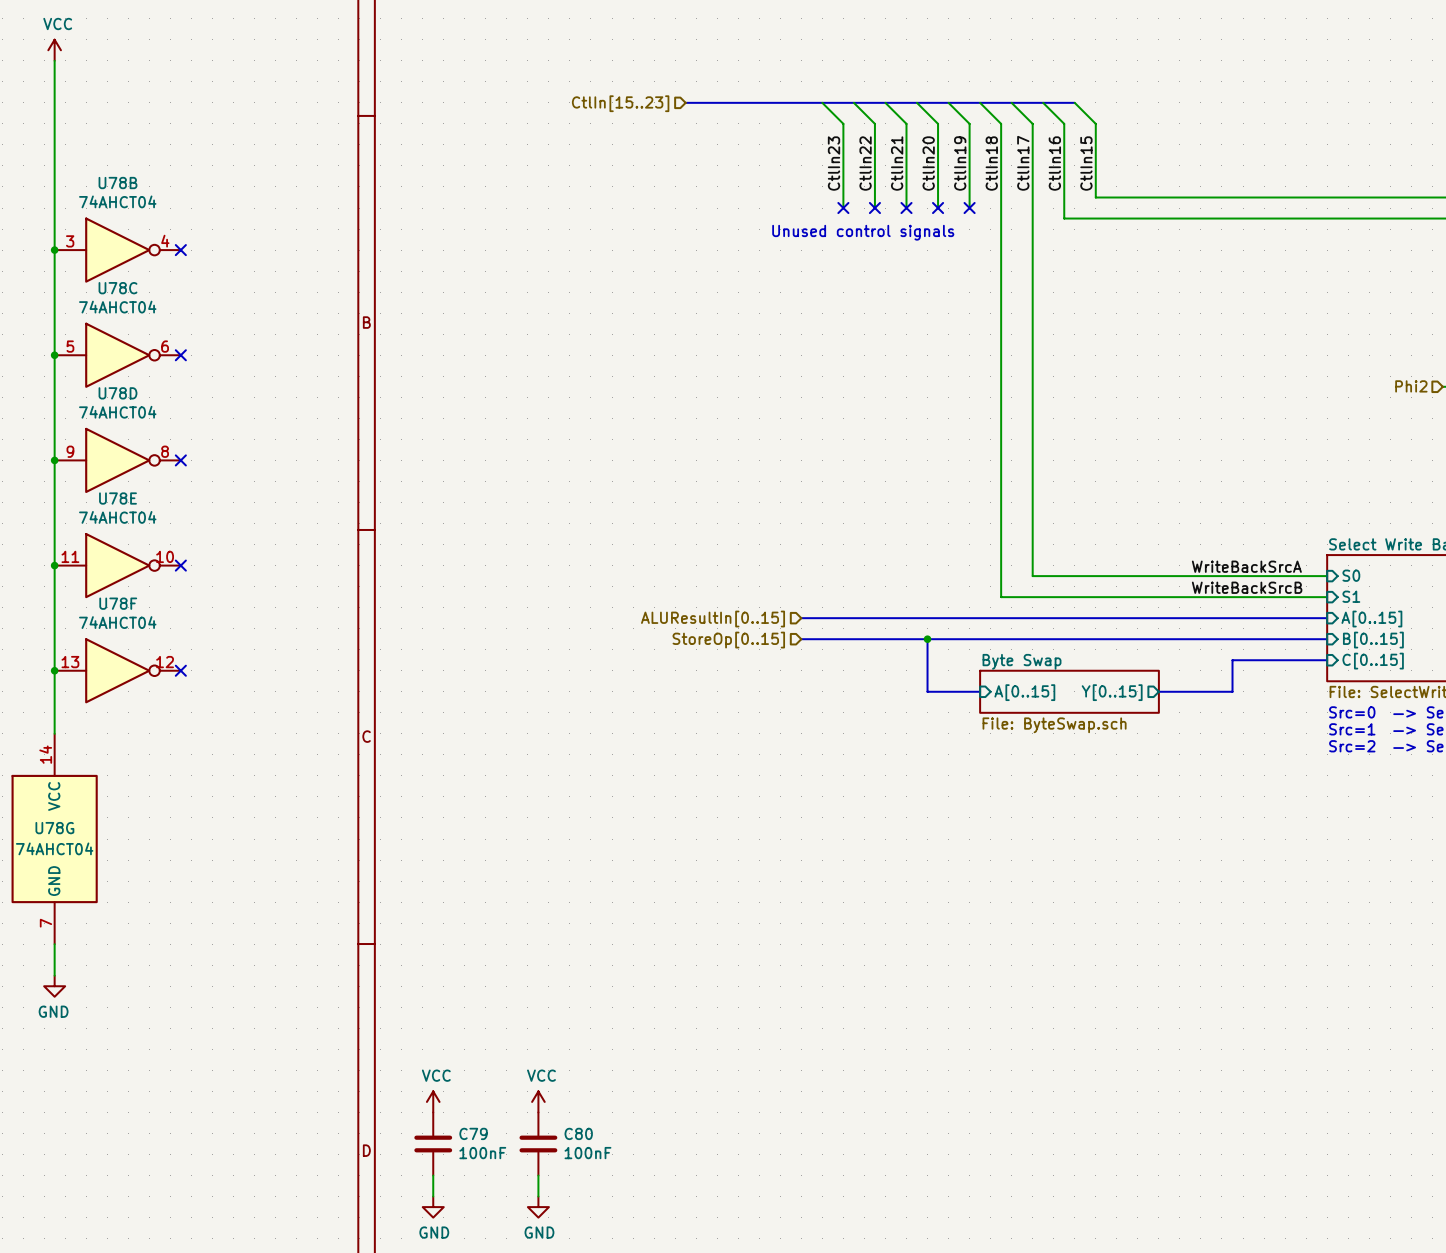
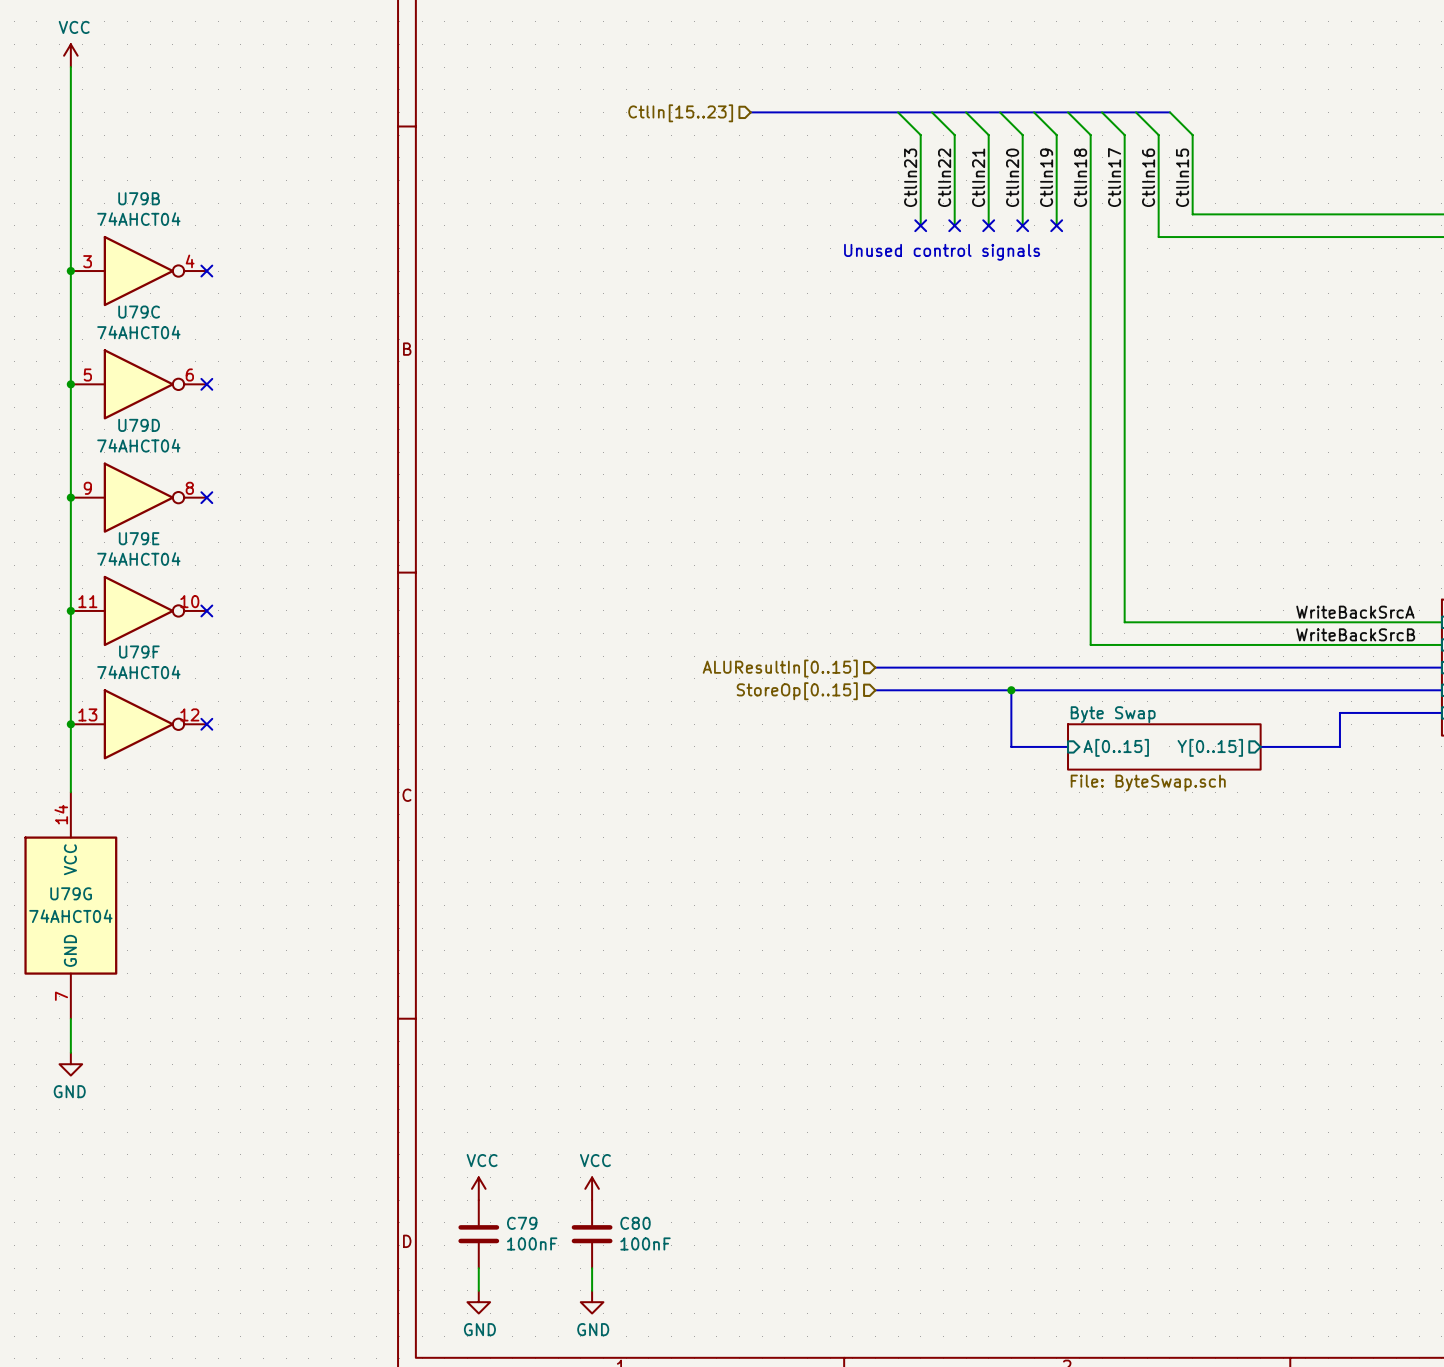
U78B name: U78B (117, 183) -> U79B (139, 198)
U78C name: U78C (117, 288) -> U79C (139, 312)
U78D name: U78D (117, 393) -> U79D (139, 425)
U78E name: U78E (117, 498) -> U79E (139, 538)
U78F name: U78F (118, 603) -> U79F (139, 652)
U78G name: U78G (54, 828) -> U79G (71, 893)

